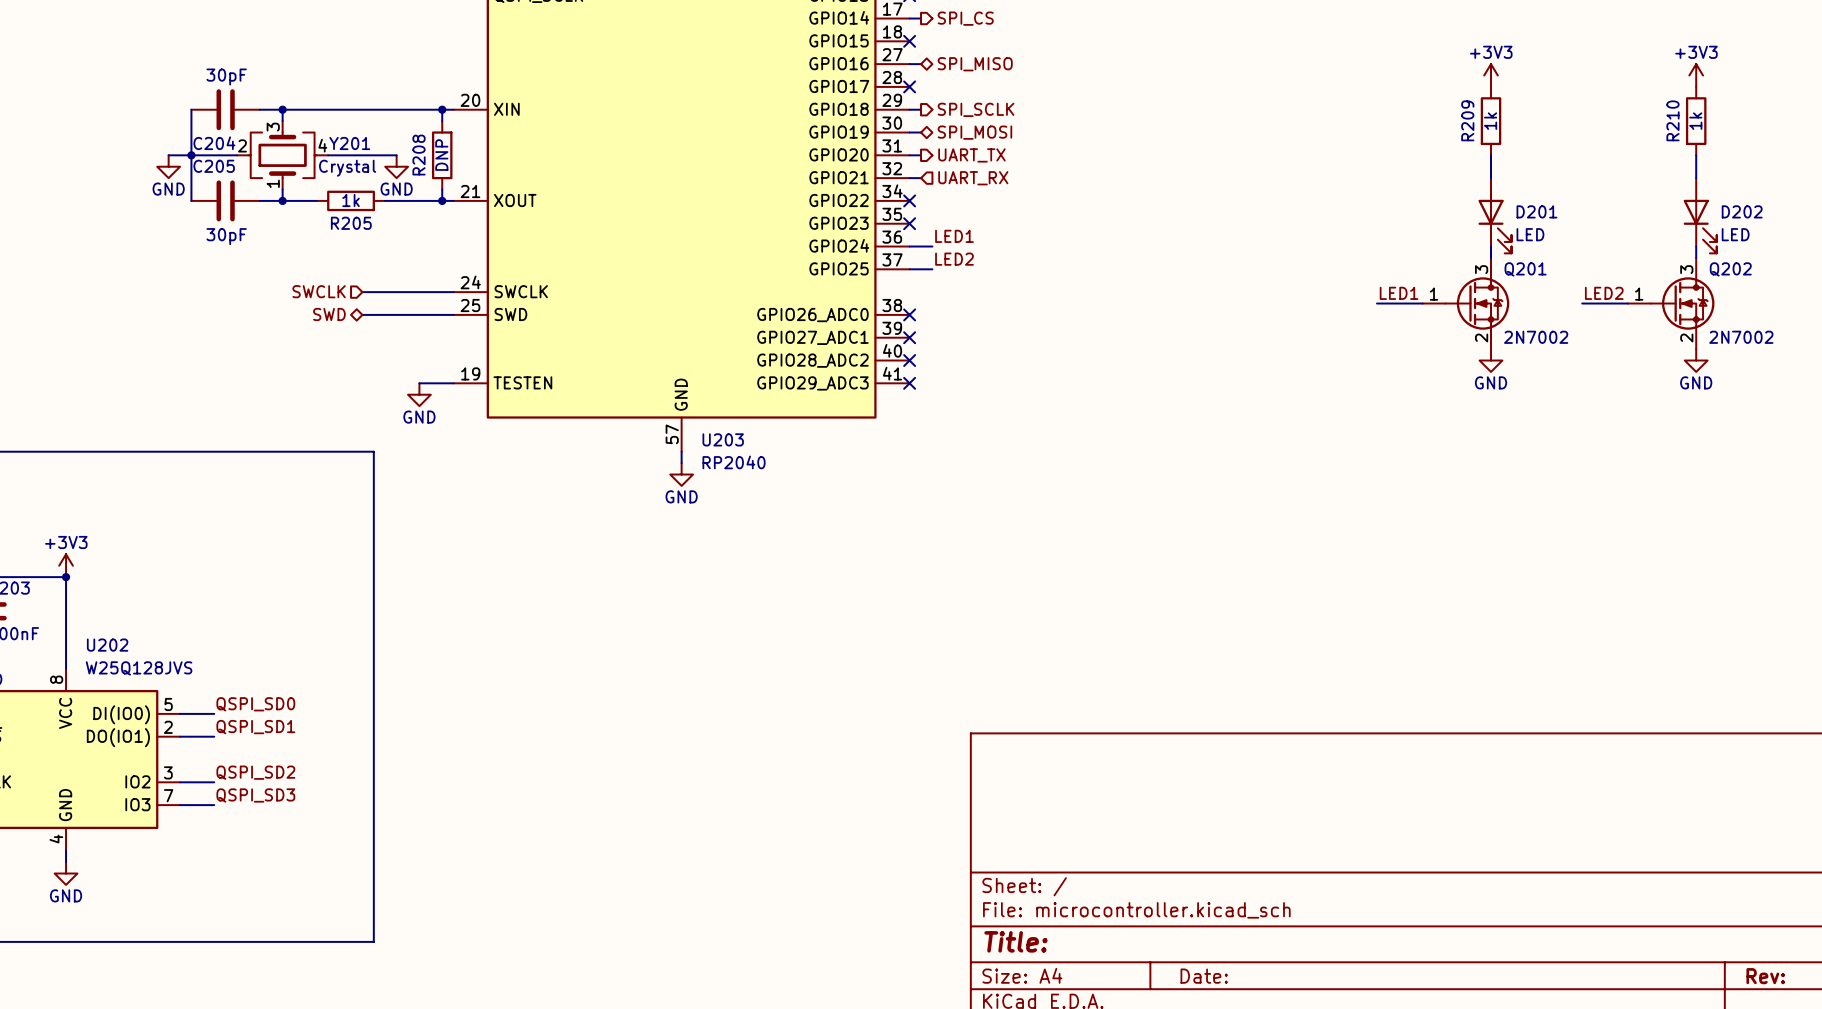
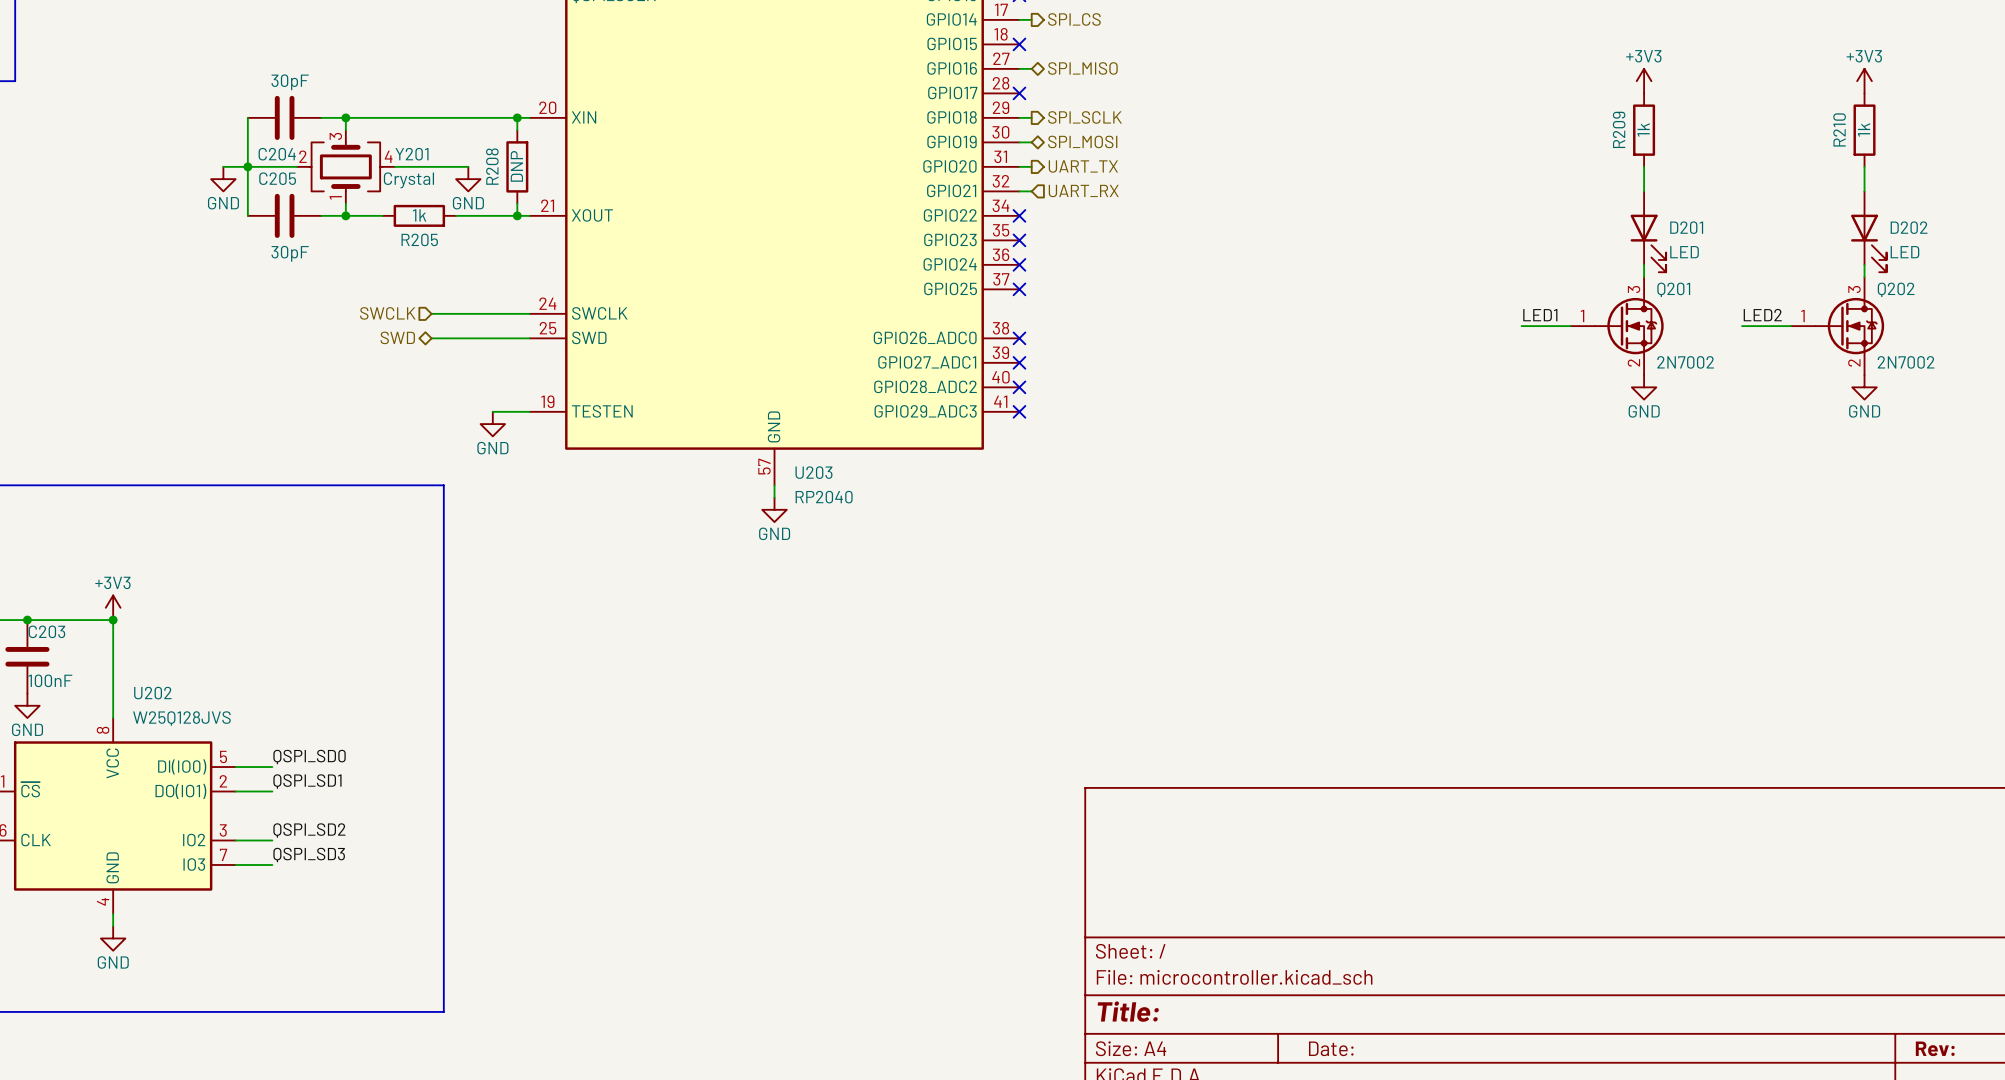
label: LED1 (954, 236) -> none
wire: (909, 246) (932, 246) -> none
no-connect mark: none -> (1019, 264)
label: LED2 (954, 259) -> none
wire: (909, 269) (932, 269) -> none
no-connect mark: none -> (1019, 289)

